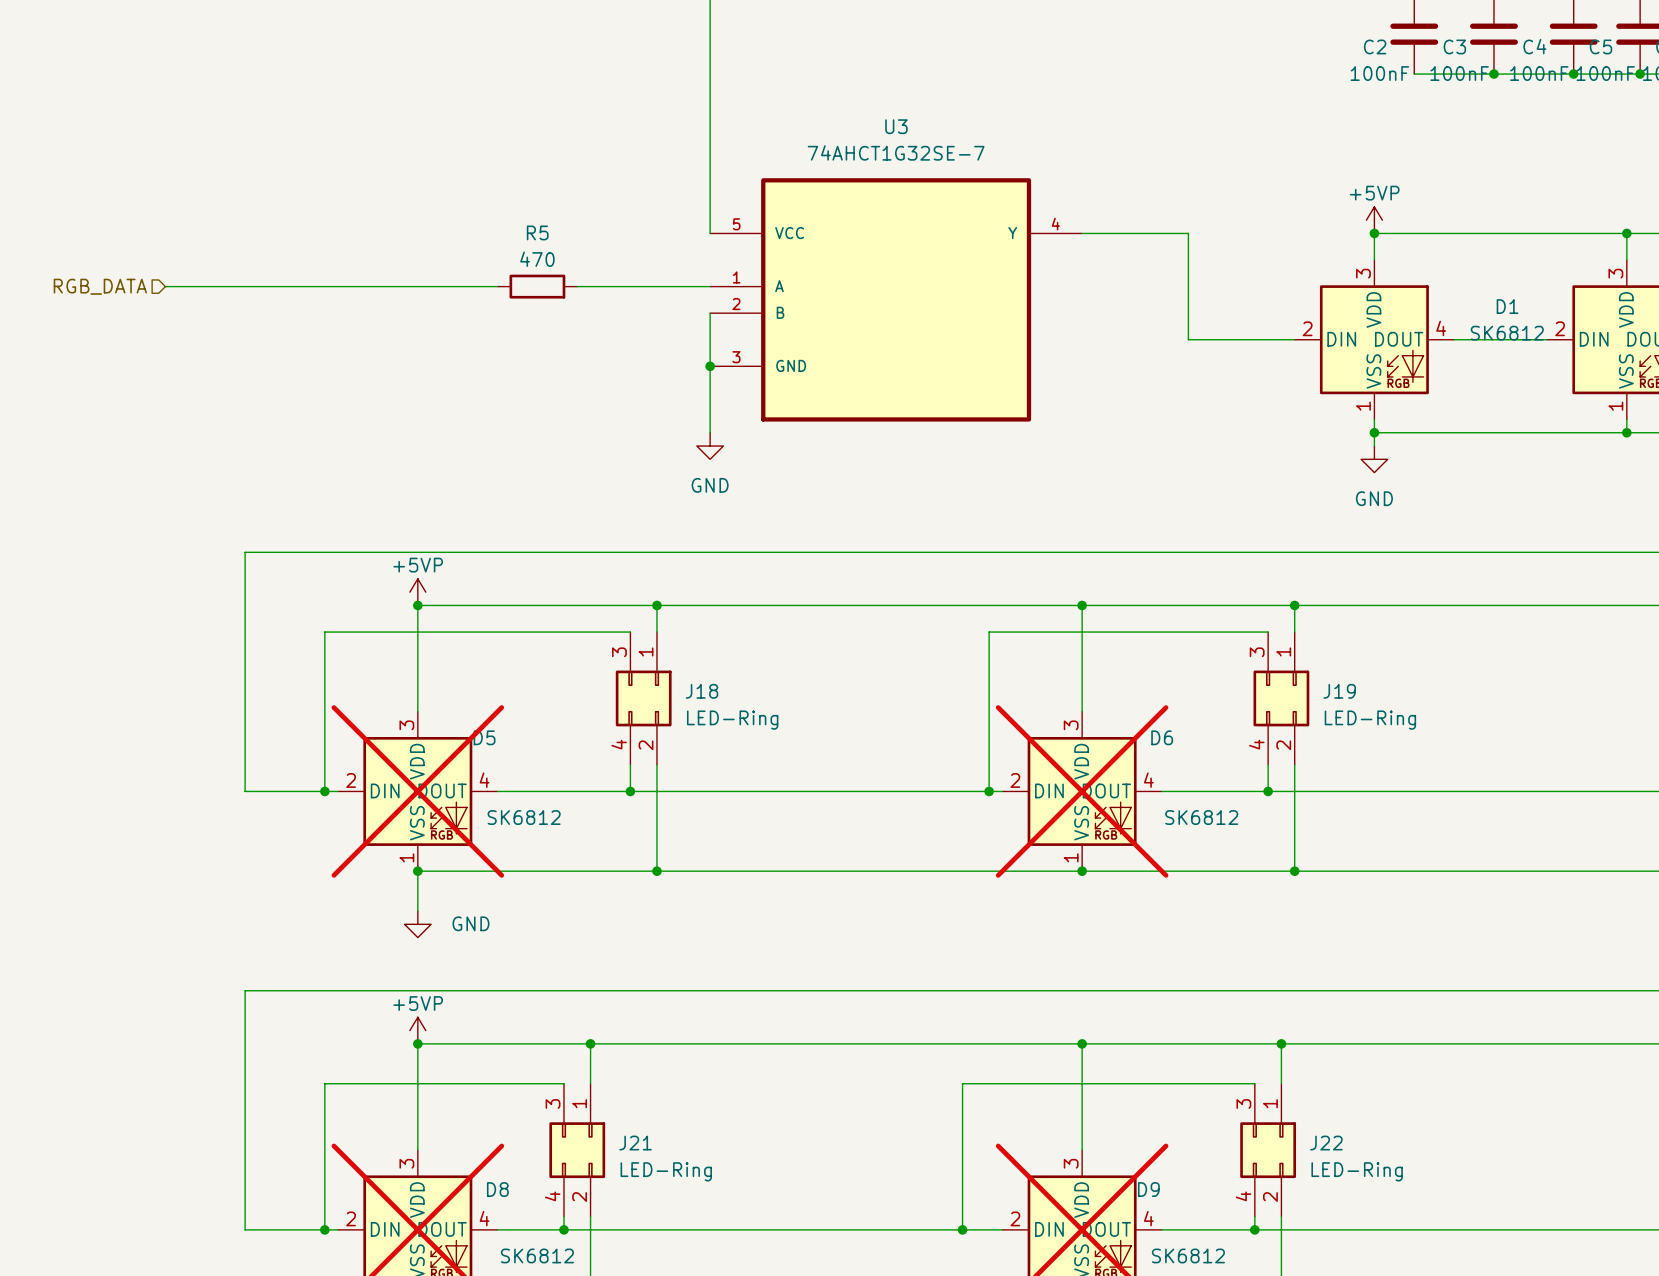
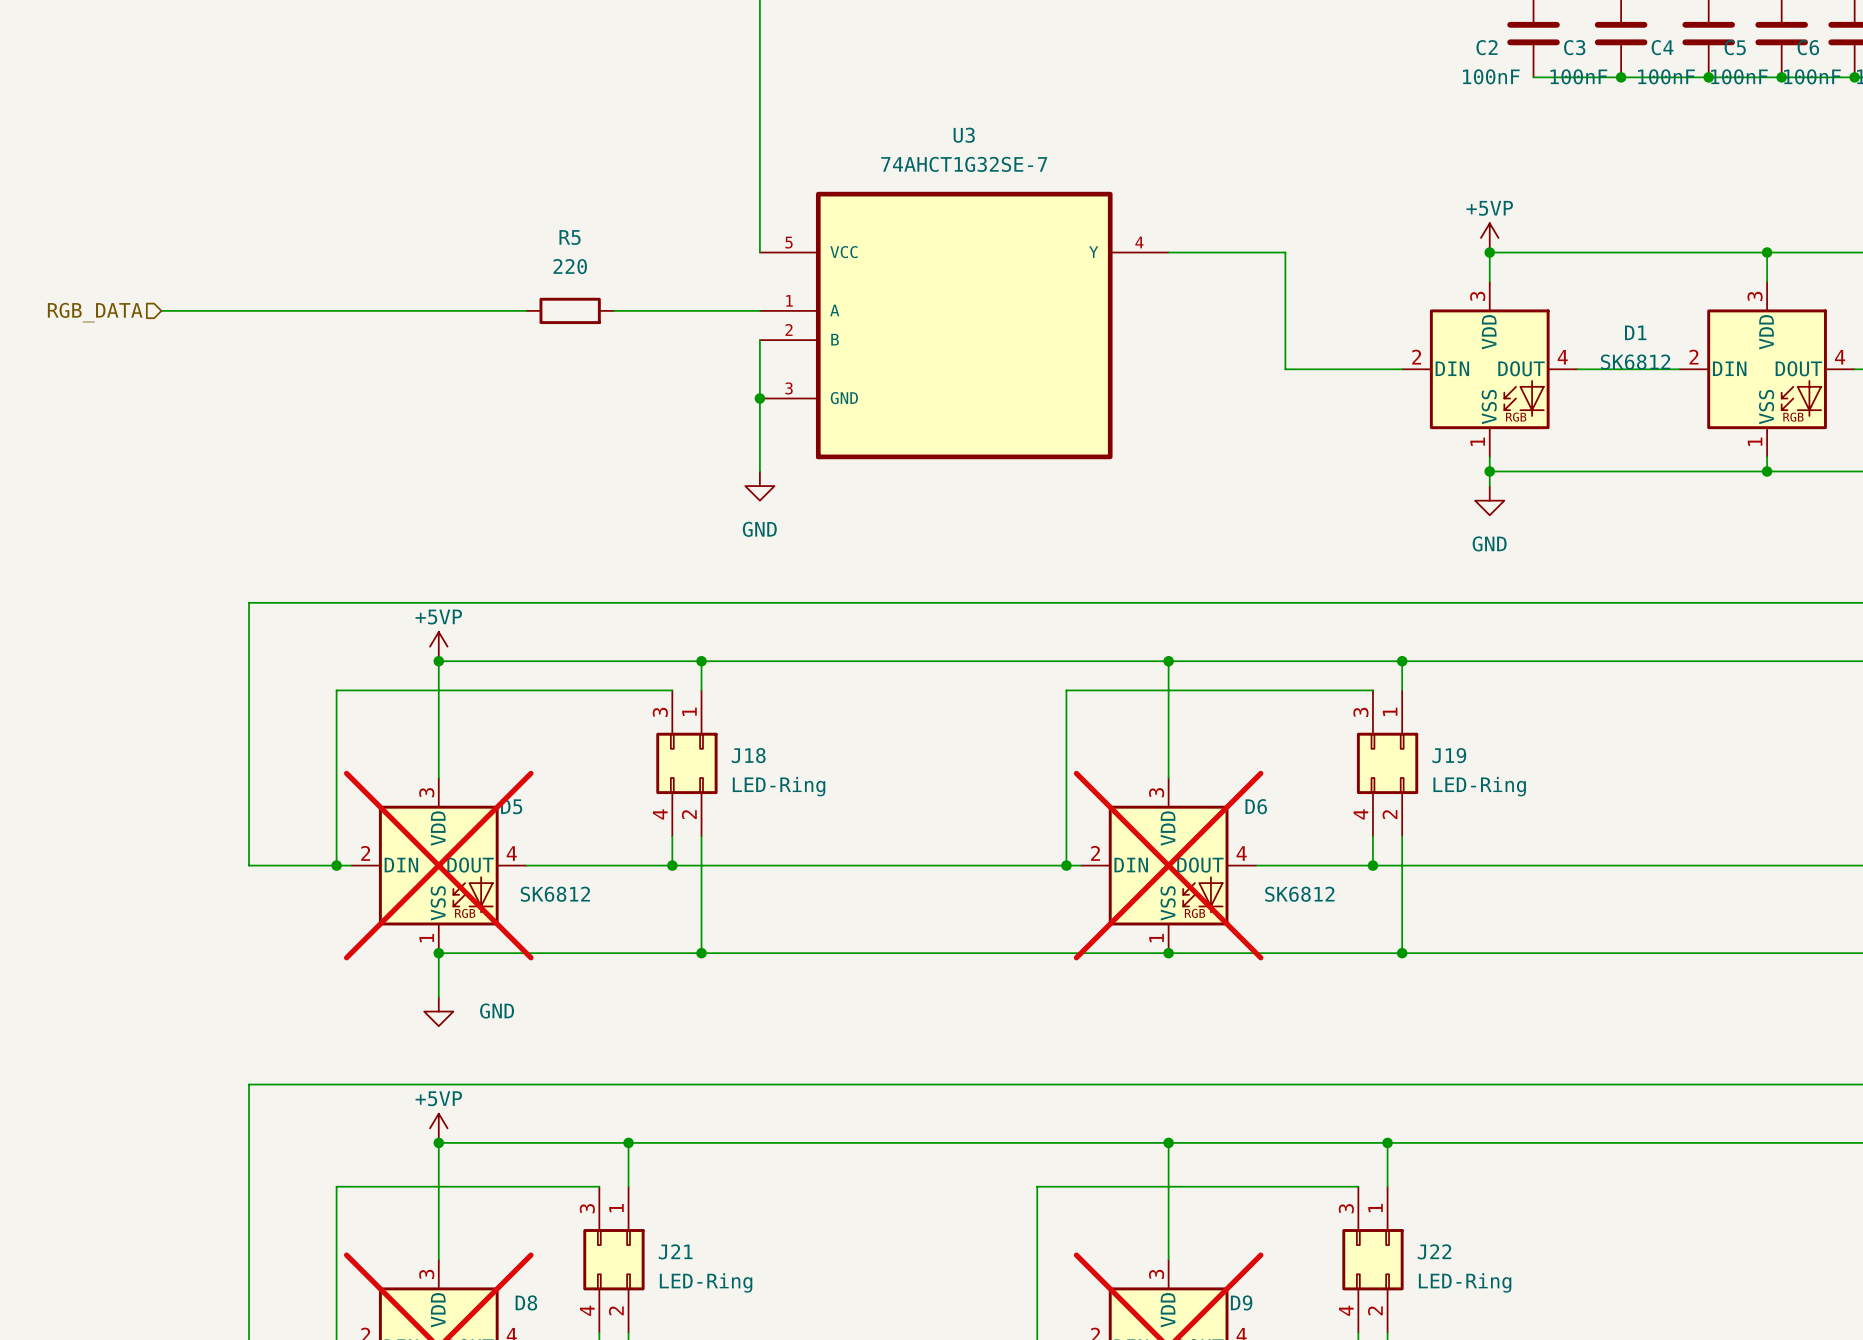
R5 name position: R5 (537, 232) -> R5 (570, 237)
R5 value: 470 (537, 259) -> 220 (570, 266)

